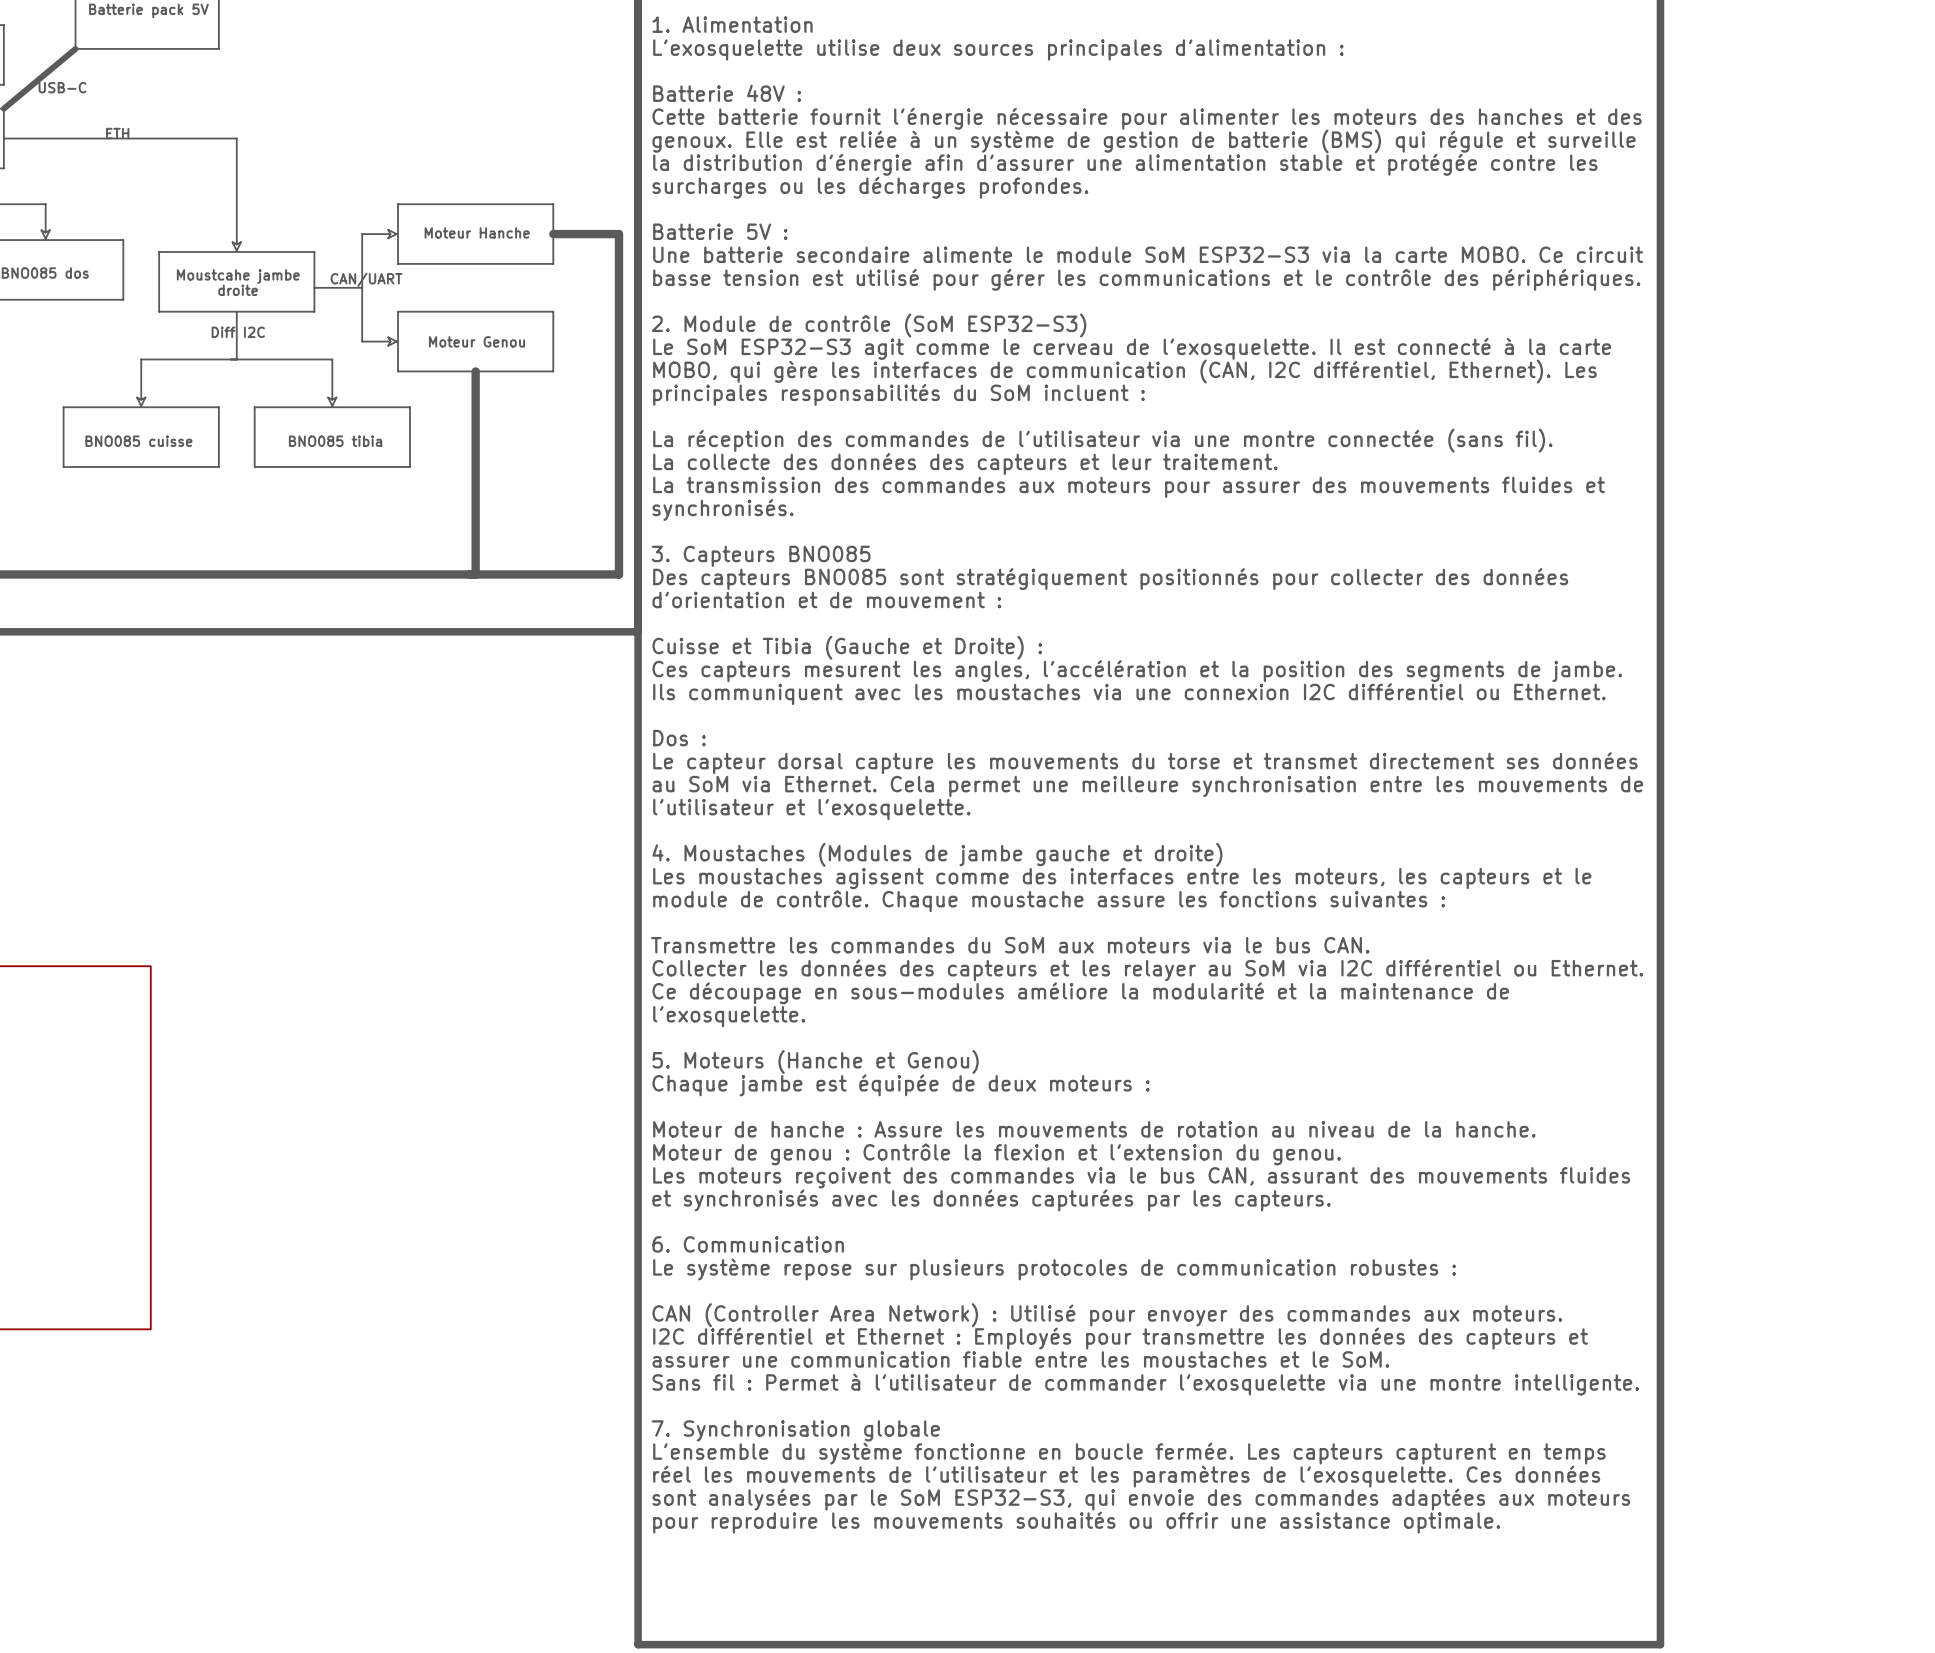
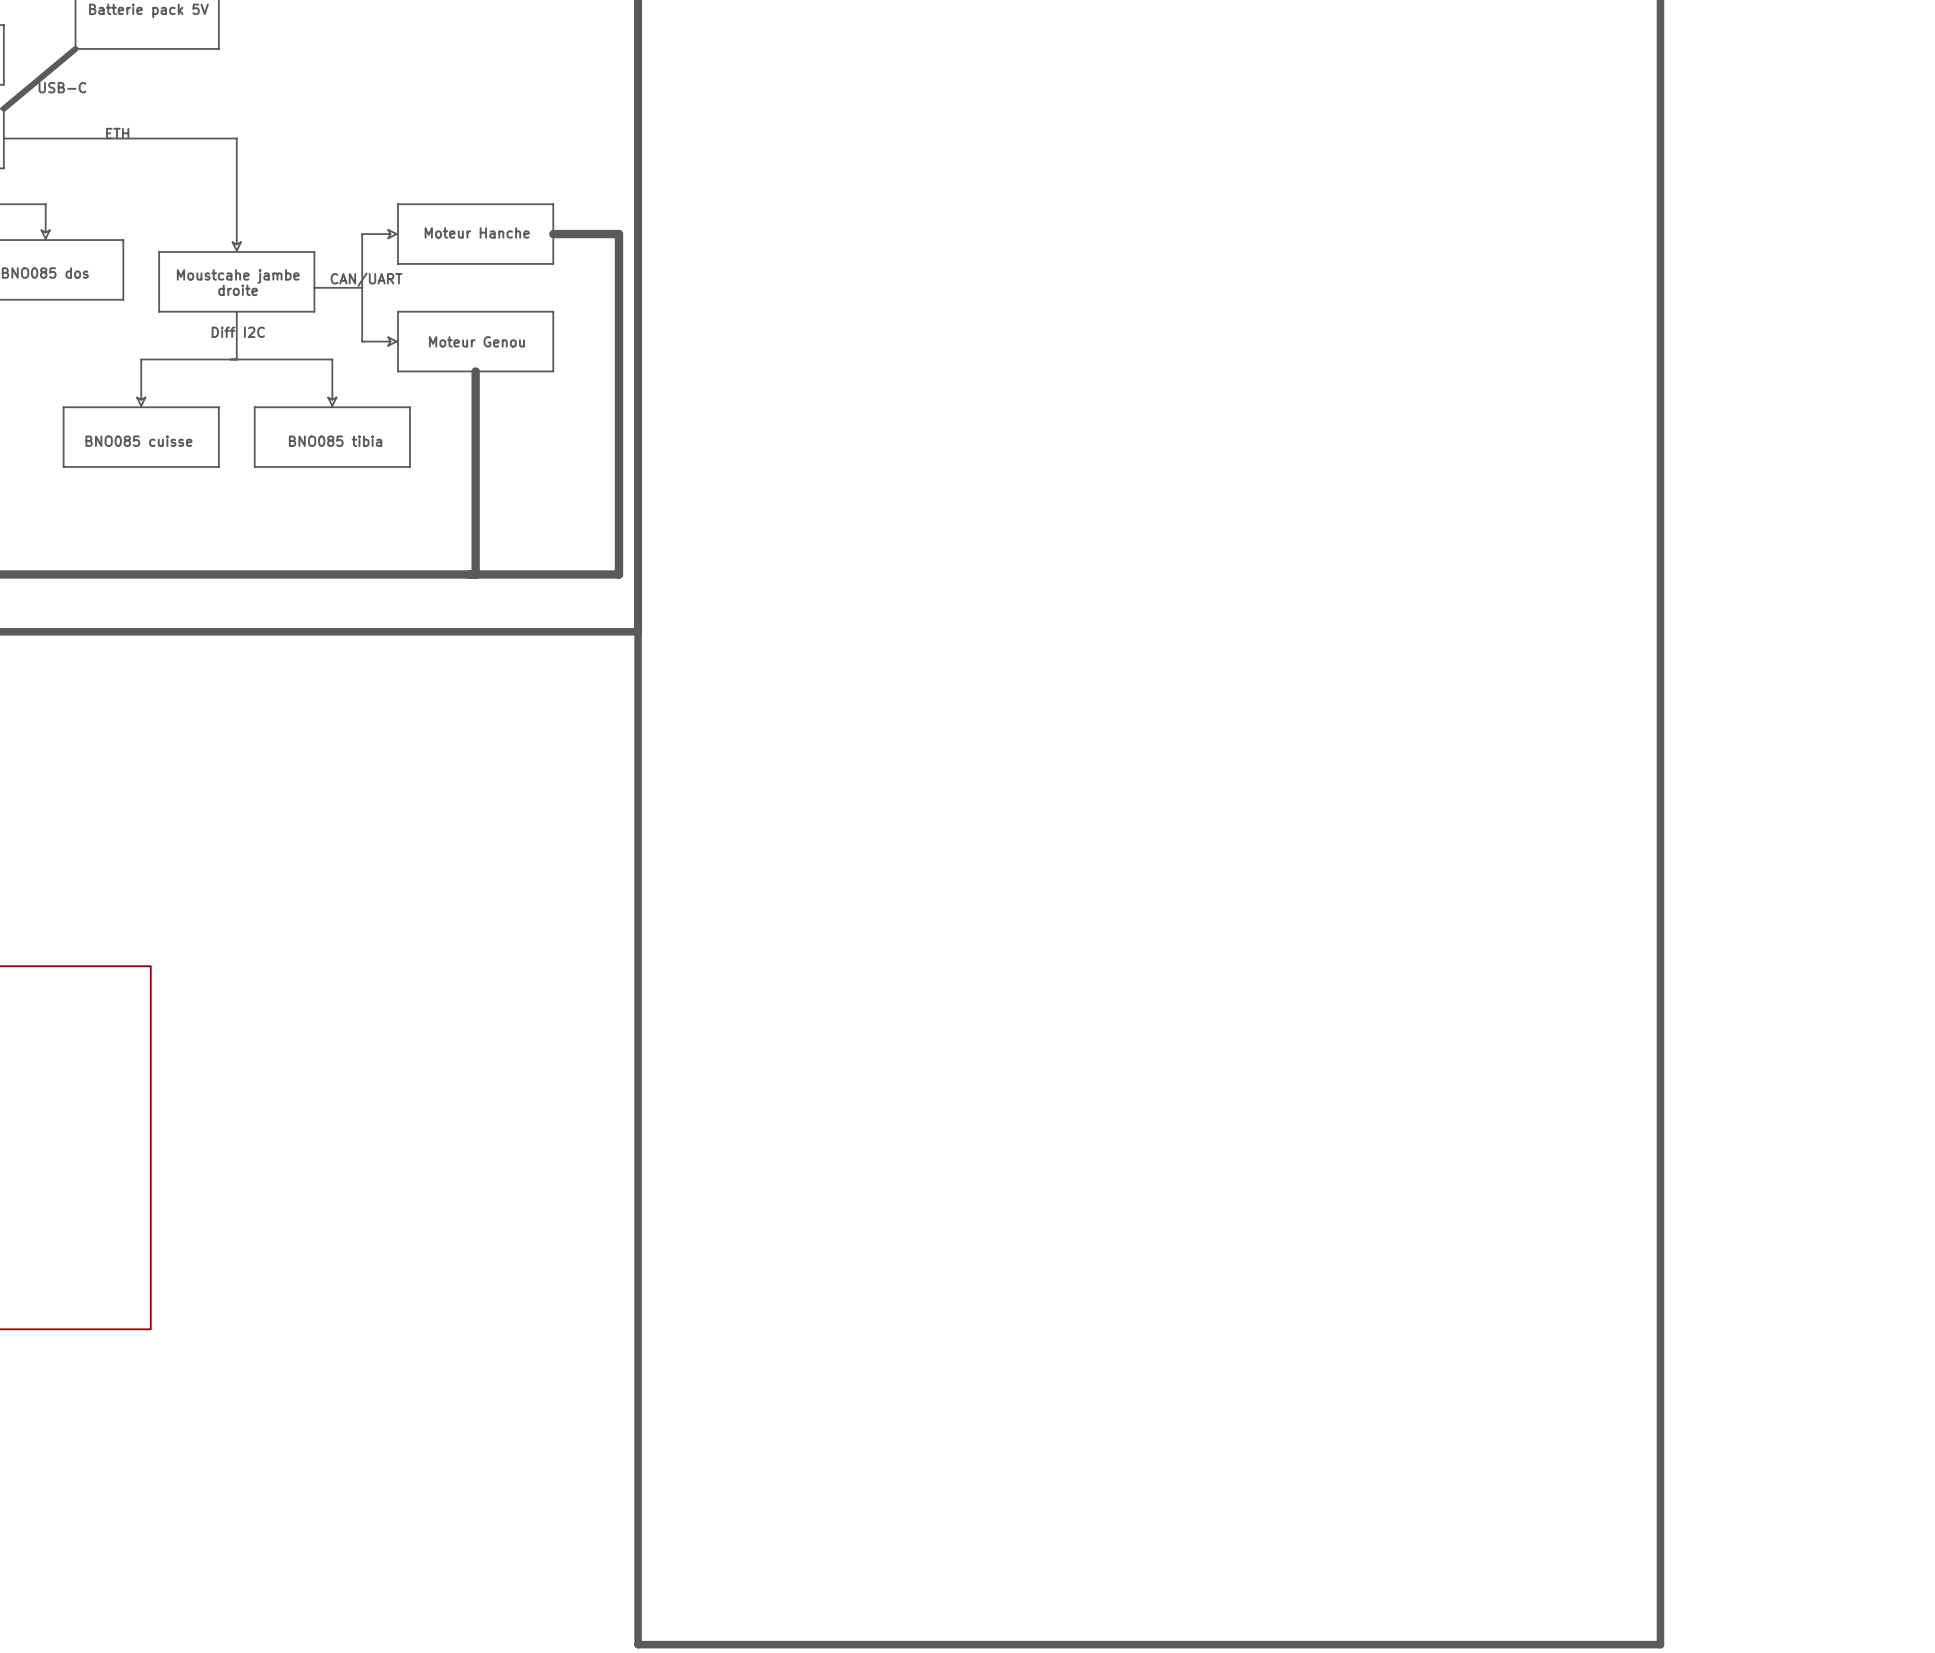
text: 1. Alimentation (732, 24) -> none
text: L'exosquelette utilise deux sources principales d'alimentation : (998, 50) -> none
text: Batterie 48V : (727, 93) -> none
text: Cette batterie fournit l'énergie nécessaire pour alimenter les moteurs des hanches et des (1147, 118) -> none
text: genoux. Elle est reliée à un système de gestion de batterie (BMS) qui régule et surveille (1144, 141) -> none
text: la distribution d'énergie afin d'assurer une alimentation stable et protégée contre les (1125, 164) -> none
text: surcharges ou les décharges profondes. (870, 187) -> none
text: Batterie 5V : (720, 231) -> none
text: Une batterie secondaire alimente le module SoM ESP32-S3 via la carte MOBO. Ce circuit (1148, 254) -> none
text: basse tension est utilisé pour gérer les communications et le contrôle des périphériques. (1146, 279) -> none
text: 2. Module de contrôle (SoM ESP32-S3) (869, 325) -> none
text: Le SoM ESP32-S3 agit comme le cerveau de l'exosquelette. Il est connecté à la carte (1132, 348) -> none
text: MOBO, qui gère les interfaces de communication (CAN, I2C différentiel, Ethernet). Les (1124, 371) -> none
text: principales responsabilités du SoM incluent : (898, 394) -> none
text: La réception des commandes de l'utilisateur via une montre connectée (sans fil). (1102, 440) -> none
text: La collecte des données des capteurs et leur traitement. (965, 463) -> none
text: La transmission des commandes aux moteurs pour assurer des mouvements fluides et (1129, 487) -> none
text: synchronisés. (723, 509) -> none
text: 3. Capteurs BNO085 (761, 556) -> none
text: Des capteurs BNO085 sont stratégiquement positionnés pour collecter des données (1110, 579) -> none
text: d'orientation et de mouvement : (826, 599) -> none
text: Cuisse et Tibia (Gauche et Droite) : (847, 647) -> none
text: Ces capteurs mesurent les angles, l'accélération et la position des segments de jambe. (1137, 671) -> none
text: Ils communiquent avec les moustaches via une connexion I2C différentiel ou Ethernet. (1129, 694) -> none
text: Dos : (679, 738) -> none
text: Le capteur dorsal capture les mouvements du torse et transmet directement ses données (1145, 763) -> none
text: au SoM via Ethernet. Cela permet une meilleure synchronisation entre les mouvements de (1147, 786) -> none
text: l'utilisateur et l'exosquelette. (811, 809) -> none
text: 4. Moustaches (Modules de jambe gauche et droite) (937, 854) -> none
text: Les moustaches agissent comme des interfaces entre les moteurs, les capteurs et le (1122, 878) -> none
text: module de contrôle. Chaque moustache assure les fonctions suivantes : (1049, 901) -> none
text: Transmettre les commandes du SoM aux moteurs via le bus CAN. (1010, 945) -> none
text: Collecter les données des capteurs et les relayer au SoM via I2C différentiel ou Ethernet. (1147, 970) -> none
text: Ce découpage en sous-modules améliore la modularité et la maintenance de (1080, 993) -> none
text: l'exosquelette. (729, 1016) -> none
text: 5. Moteurs (Hanche et Genou) (815, 1061) -> none
text: Chaque jambe est équipée de deux moteurs : (901, 1085) -> none
text: Moteur de hanche : Assure les mouvements de rotation au niveau de la hanche. (1094, 1129) -> none
text: Moteur de genou : Contrôle la flexion et l'extension du genou. (997, 1154) -> none
text: Les moteurs reçoivent des commandes via le bus CAN, assurant des mouvements fluides (1141, 1177) -> none
text: et synchronisés avec les données capturées par les capteurs. (991, 1200) -> none
text: 6. Communication (748, 1244) -> none
text: Le système repose sur plusieurs protocoles de communication robustes : (1054, 1269) -> none
text: CAN (Controller Area Network) : Utilisé pour envoyer des commandes aux moteurs. (1107, 1315) -> none
text: I2C différentiel et Ethernet : Employés pour transmettre les données des capteurs et (1120, 1338) -> none
text: assurer une communication fiable entre les moustaches et le SoM. (1020, 1359) -> none
text: Sans fil : Permet à l'utilisateur de commander l'exosquelette via une montre intelligente. (1145, 1384) -> none
text: 7. Synchronisation globale (795, 1430) -> none
text: L'ensemble du système fonctionne en boucle fermée. Les capteurs capturent en temps (1129, 1453) -> none
text: réel les mouvements de l'utilisateur et les paramètres de l'exosquelette. Ces données (1126, 1476) -> none
text: sont analysées par le SoM ESP32-S3, qui envoie des commandes adaptées aux moteurs (1141, 1499) -> none
text: pour reproduire les mouvements souhaités ou offrir une assistance optimale. (1076, 1522) -> none

